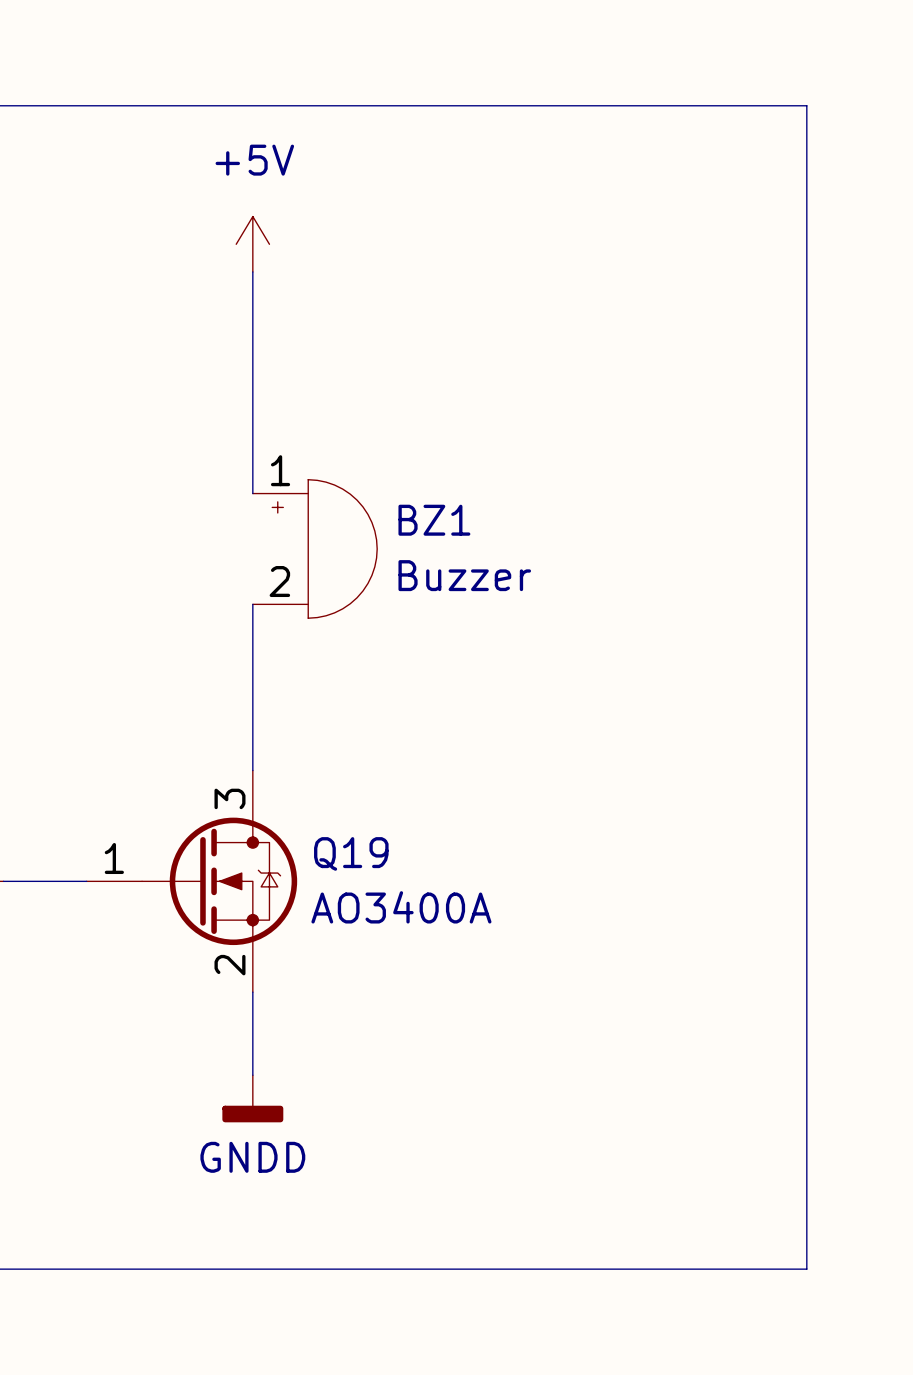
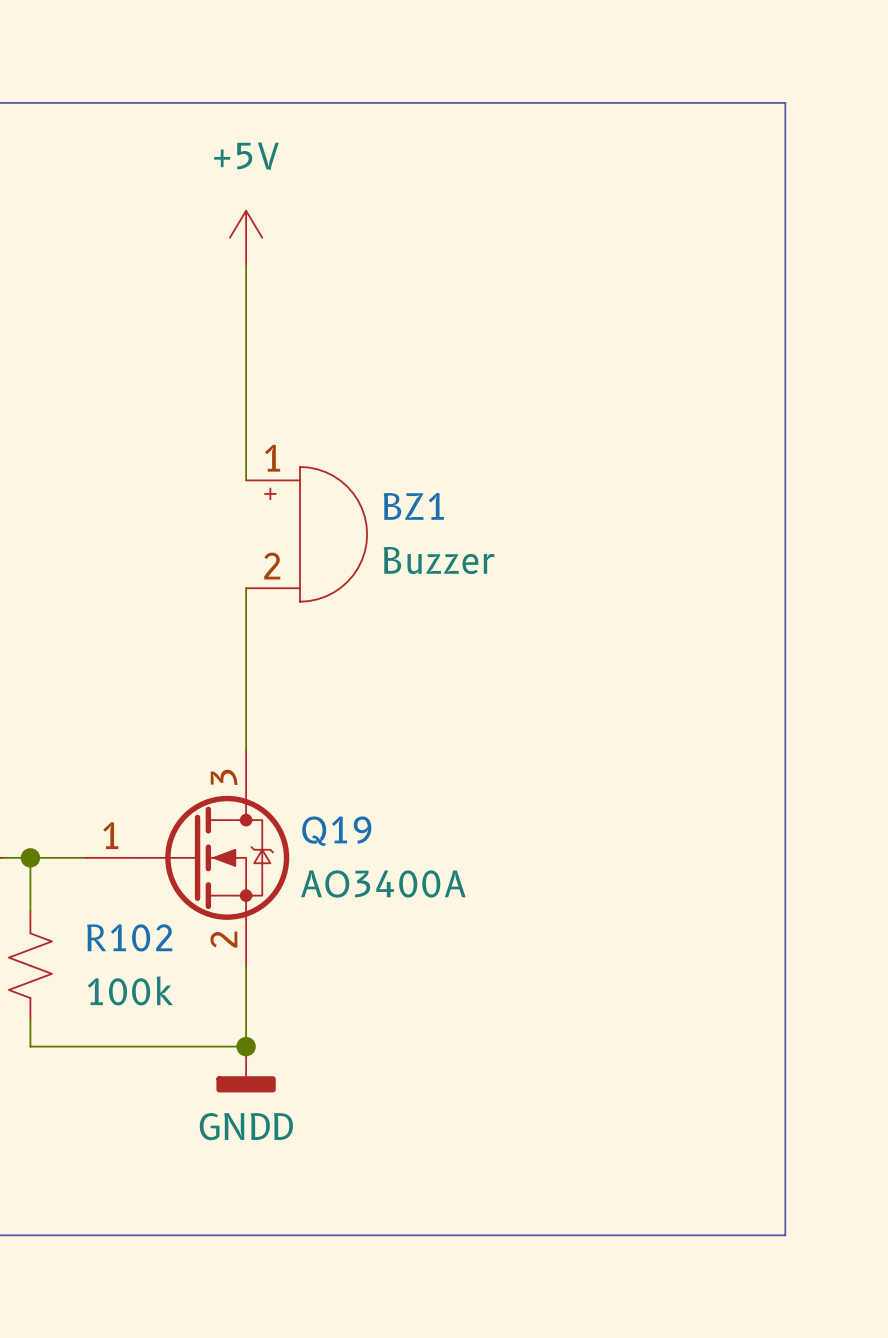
wire: none -> (30, 857) (30, 911)
junction: none -> (30, 857)
R102: none -> 100k (30, 965)
wire: none -> (30, 1019) (30, 1046) (246, 1046)
junction: none -> (246, 1046)

